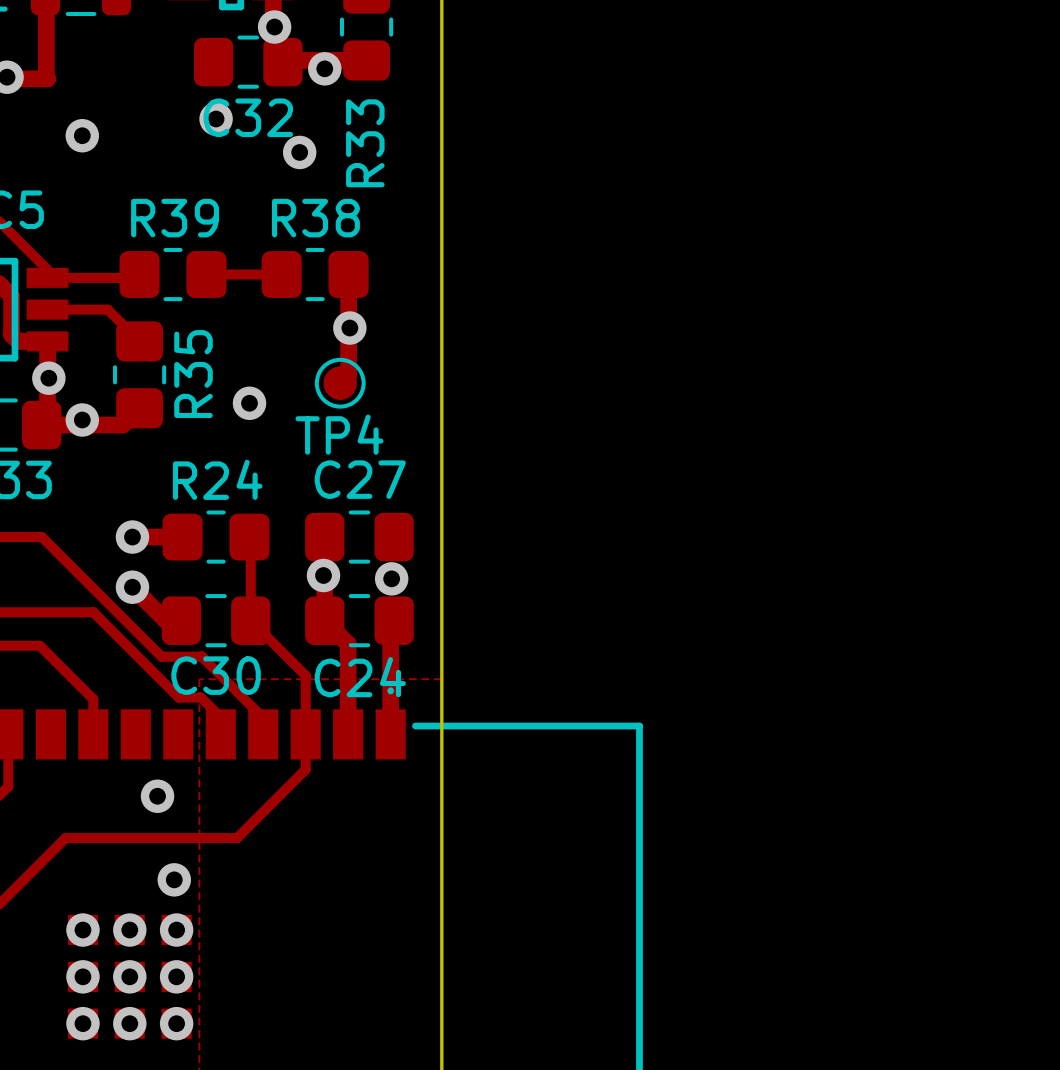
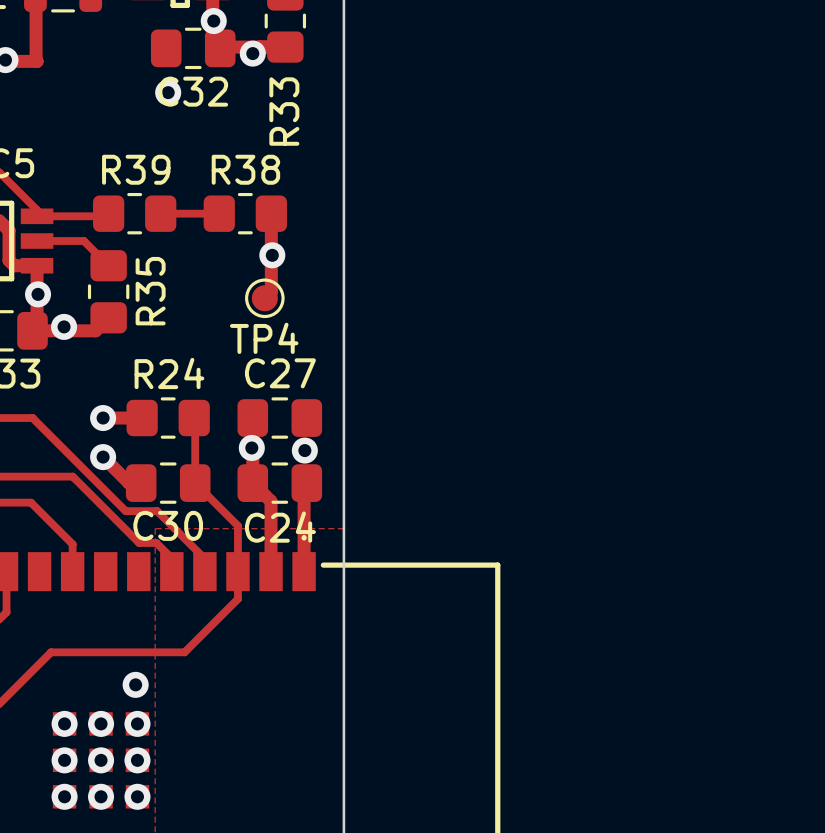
via: (82, 135) -> none
via: (299, 152) -> none
via: (249, 403) -> none
via: (157, 796) -> none

